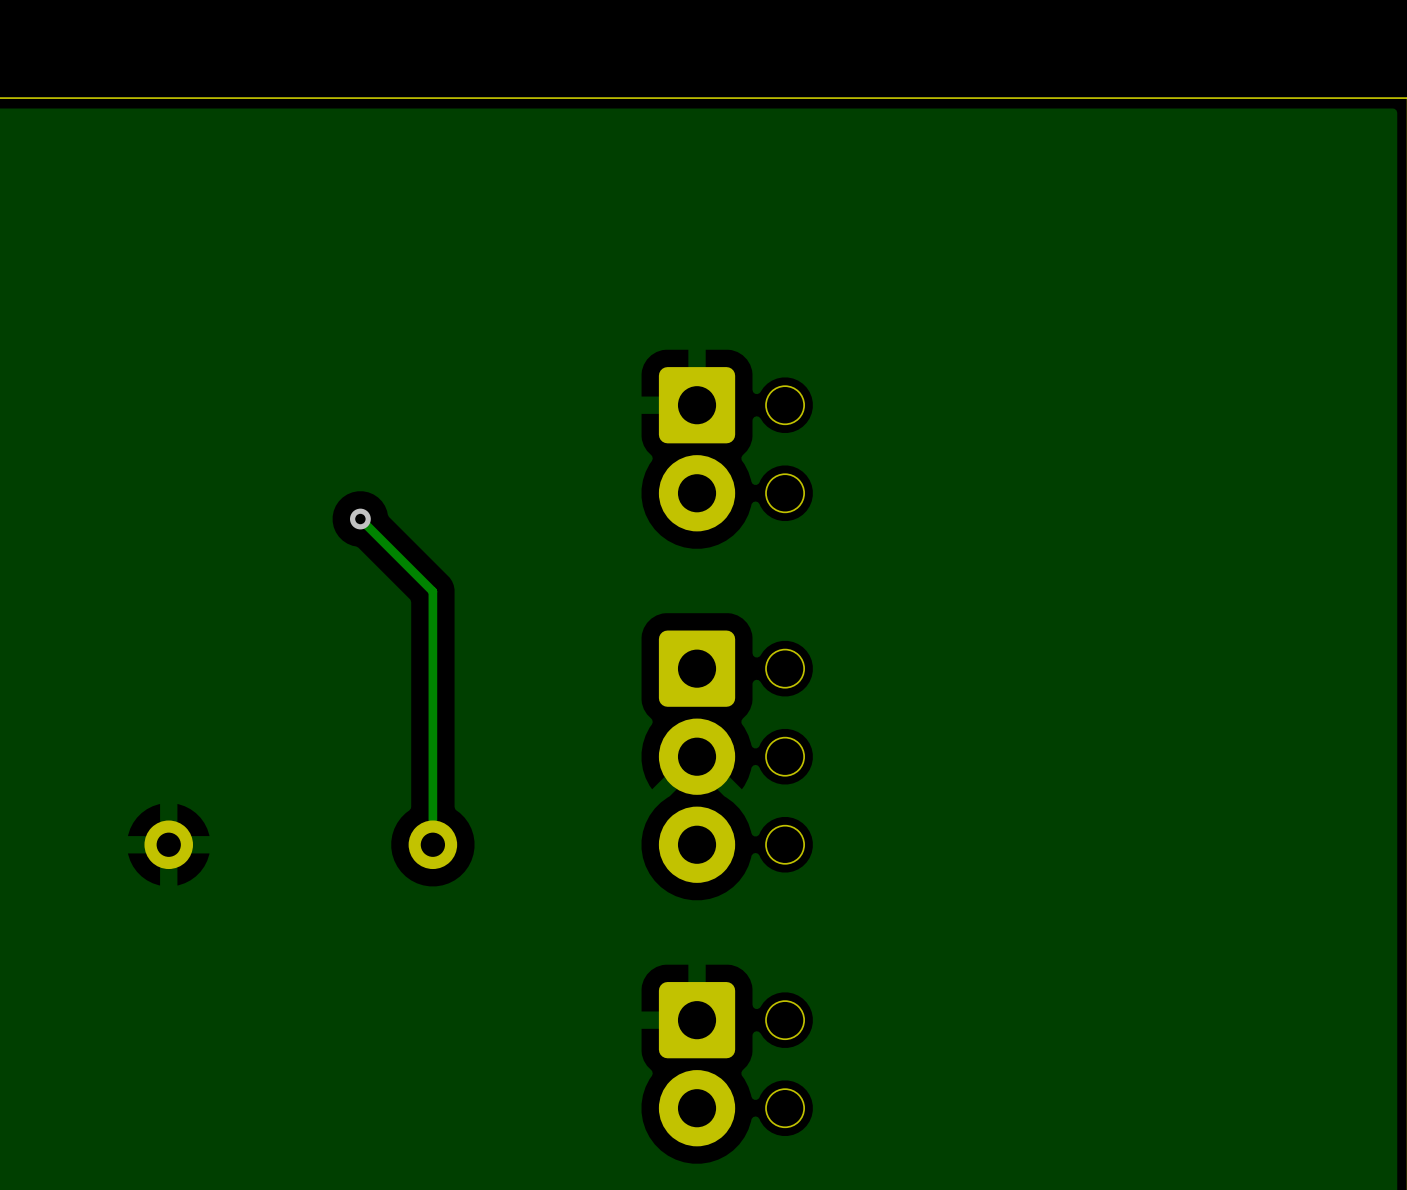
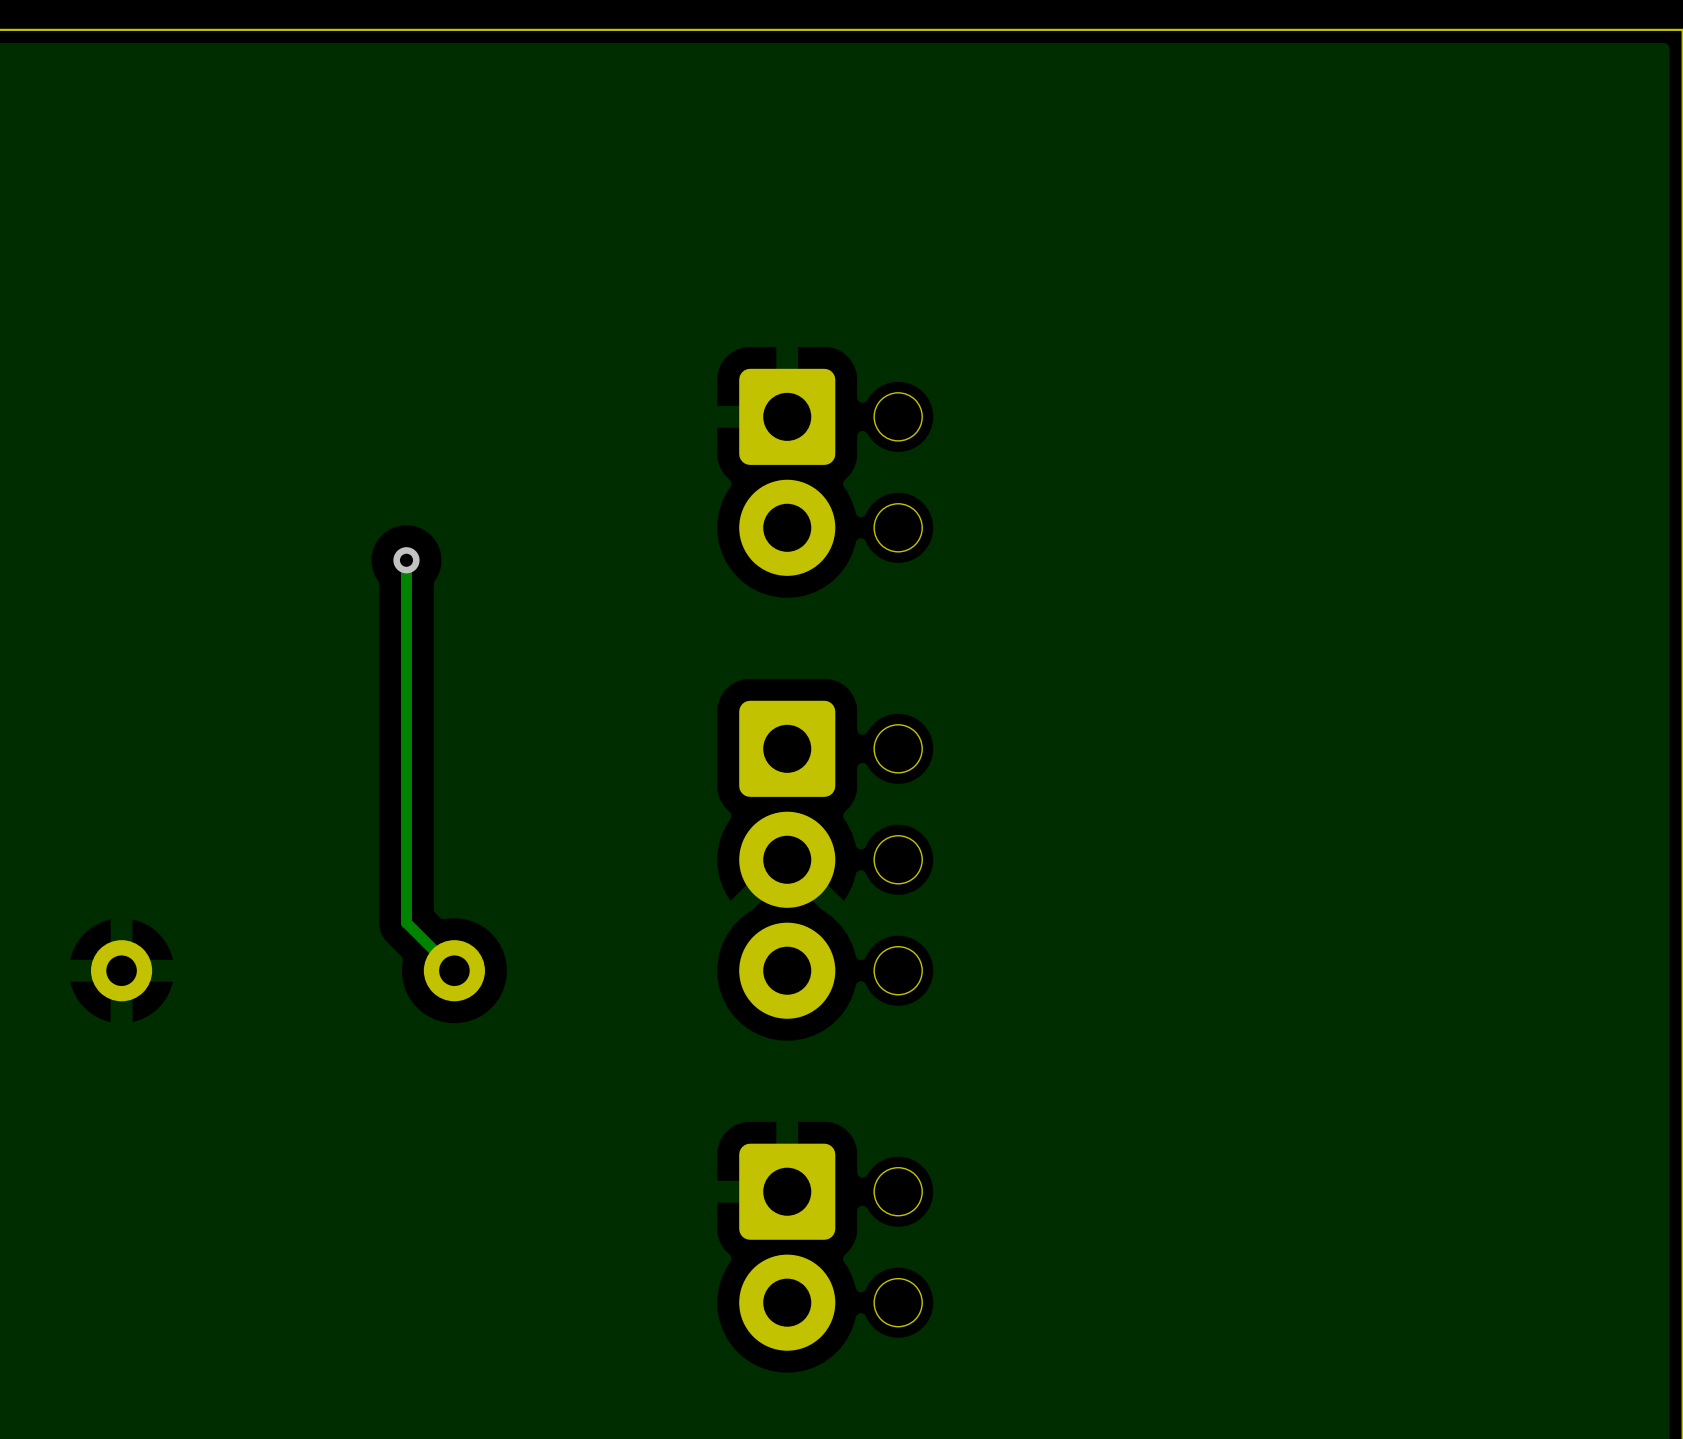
track: (360, 519) (432, 591) (432, 844) -> (406, 560) (406, 922) (454, 970)
via position: (360, 519) -> (406, 560)

